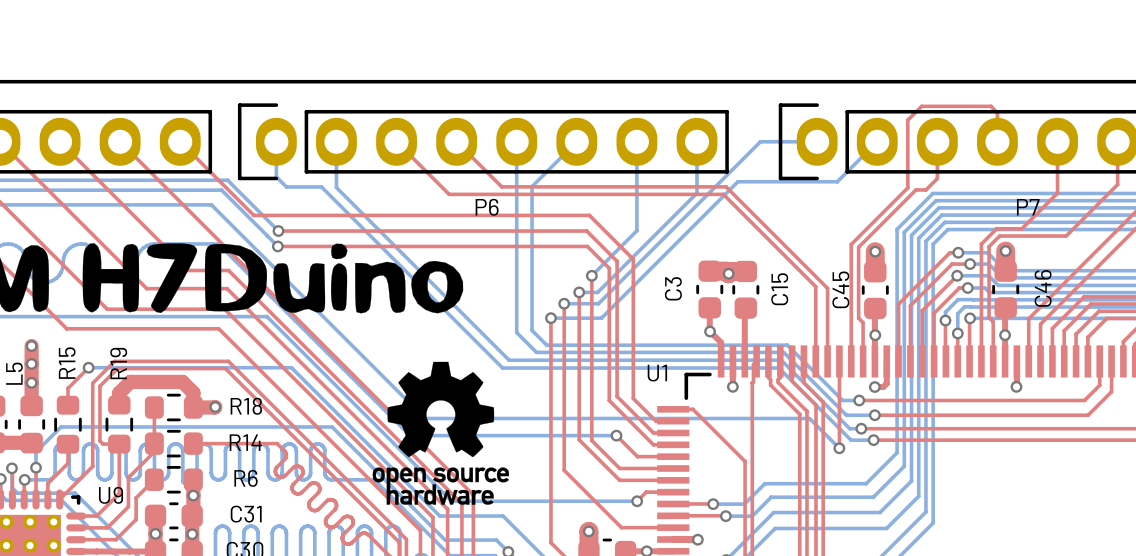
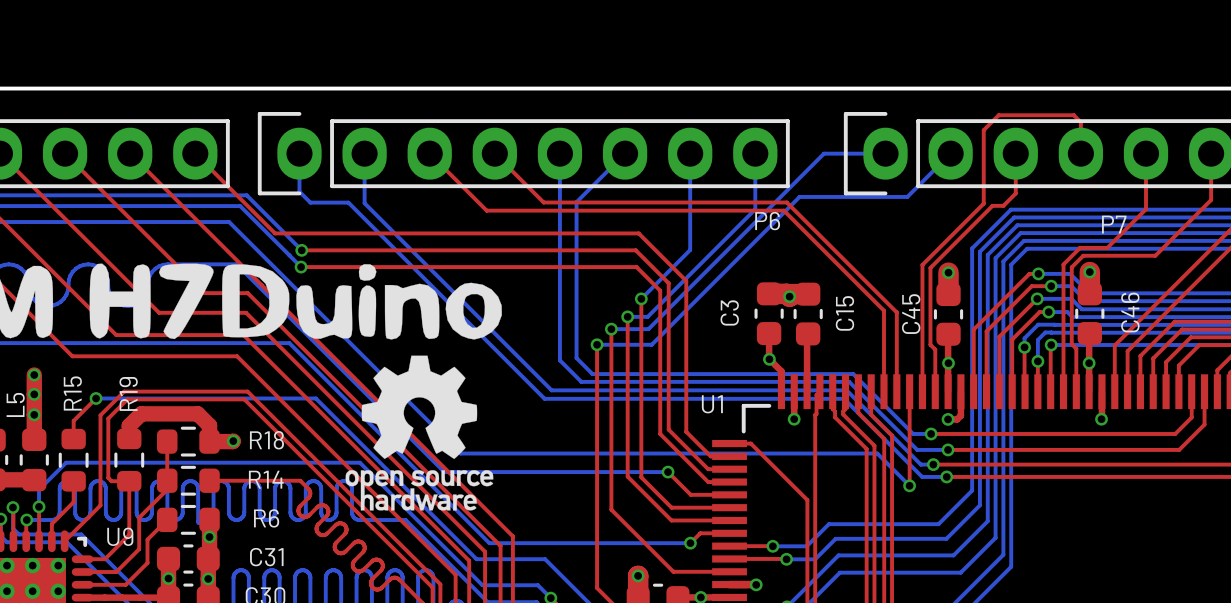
P6 name position: P6 (487, 207) -> P6 (767, 221)
drawing position: (440, 433) -> (419, 433)

